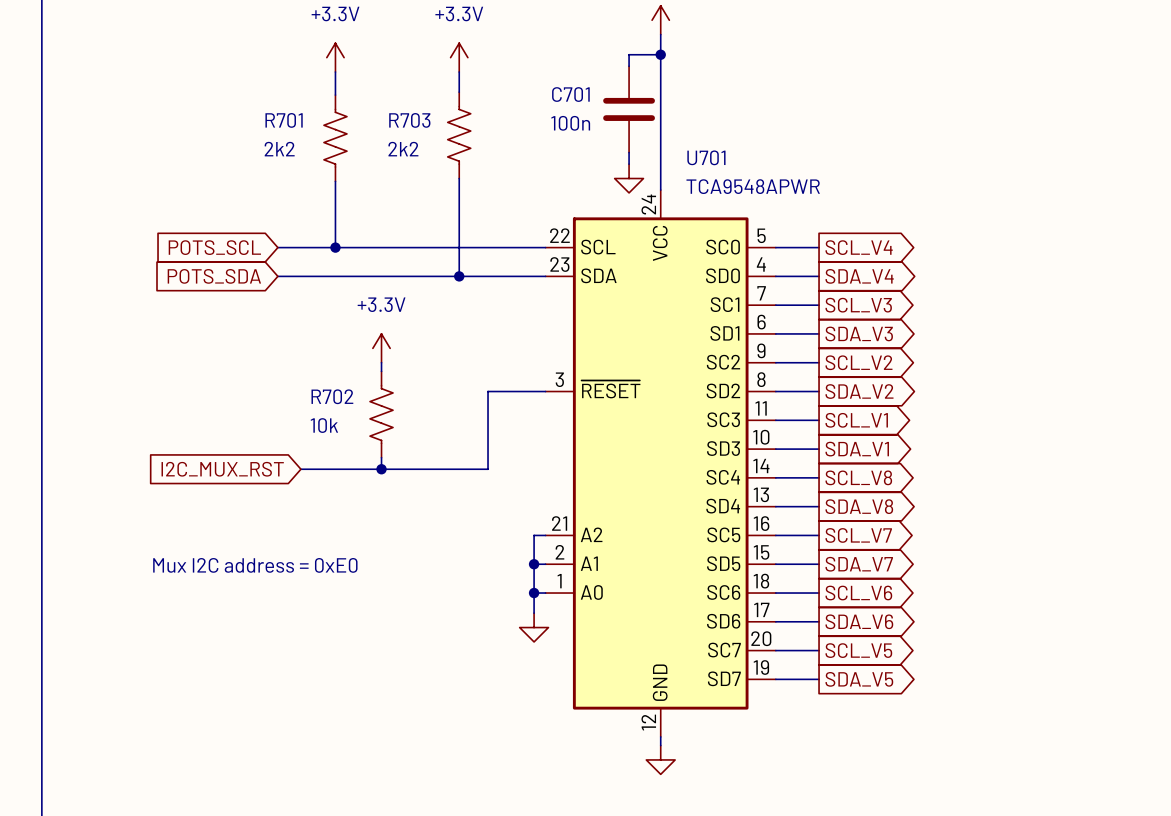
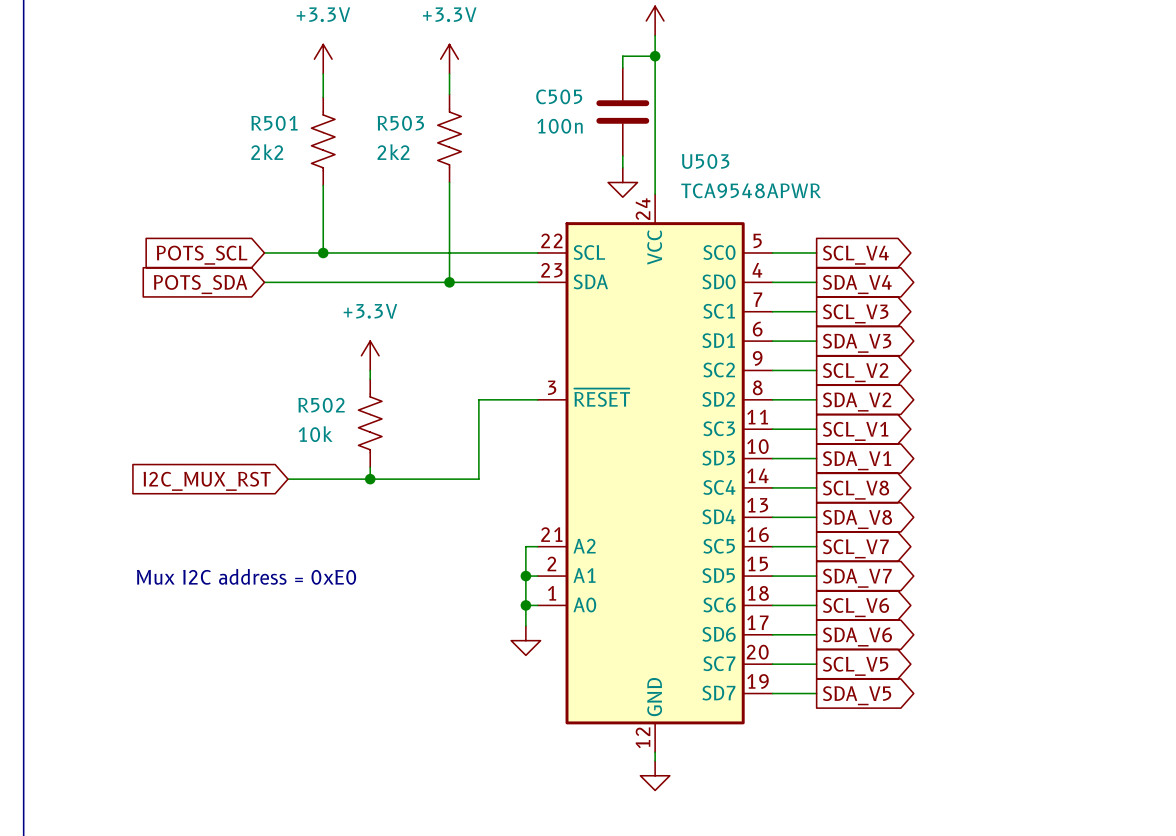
C701 name: C701 (570, 94) -> C505 (559, 96)
R701 name: R701 (284, 120) -> R501 (274, 123)
R703 name: R703 (409, 120) -> R503 (400, 123)
U701 name: U701 (706, 157) -> U503 (705, 161)
R702 name: R702 (332, 396) -> R502 (321, 405)

